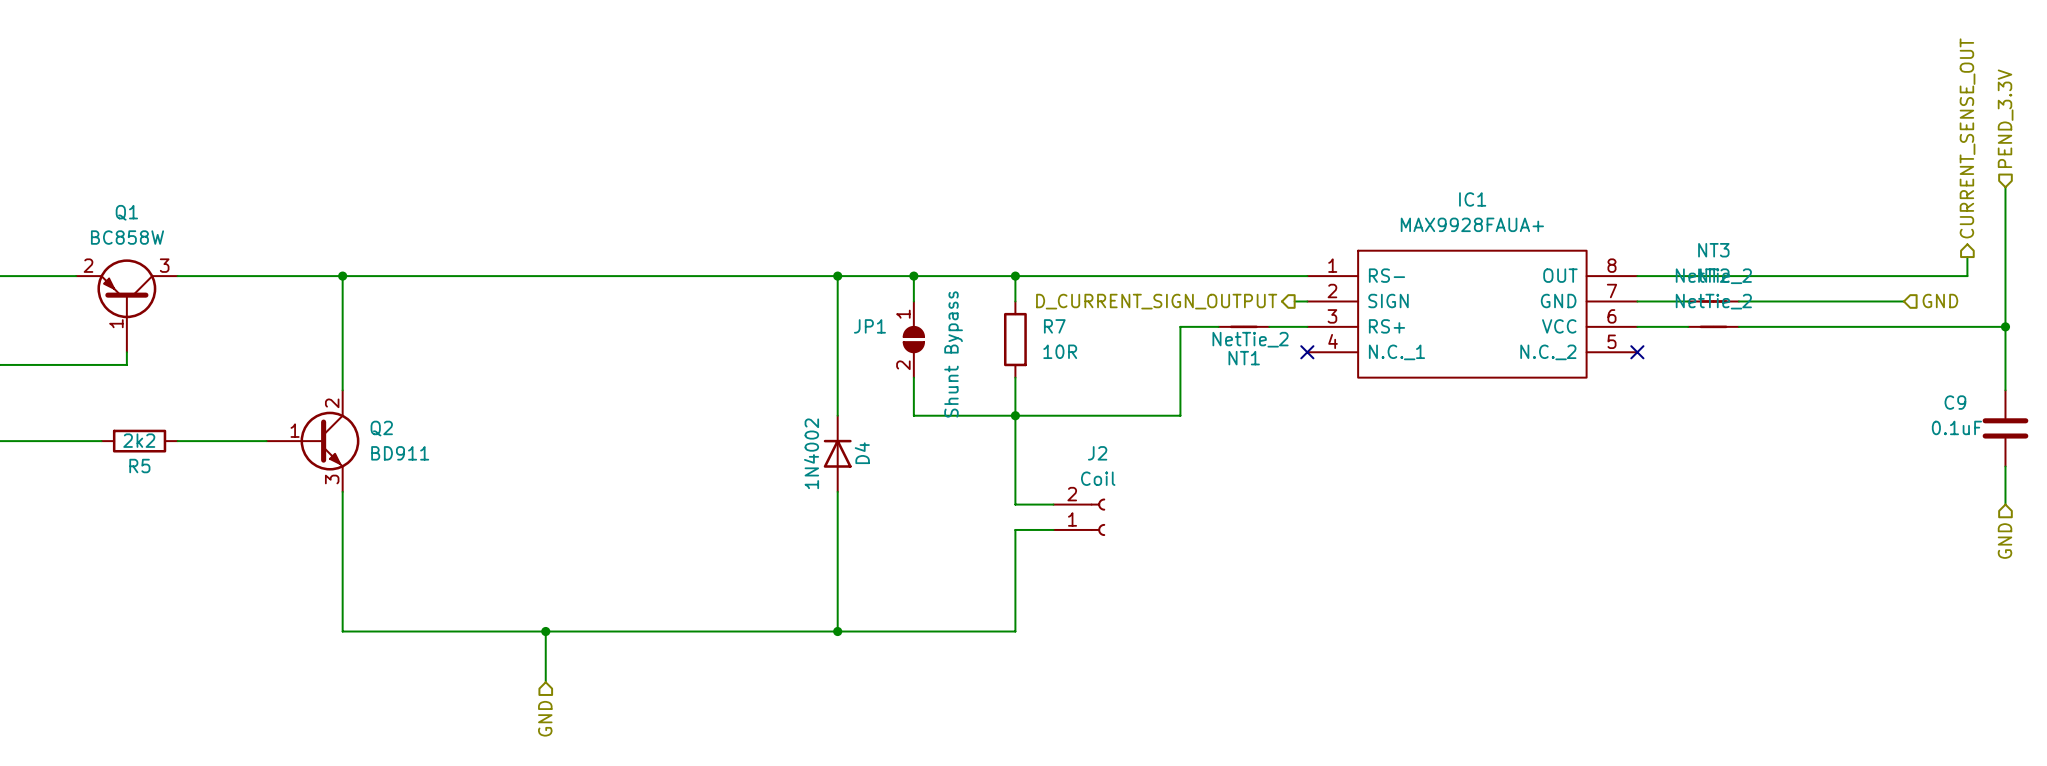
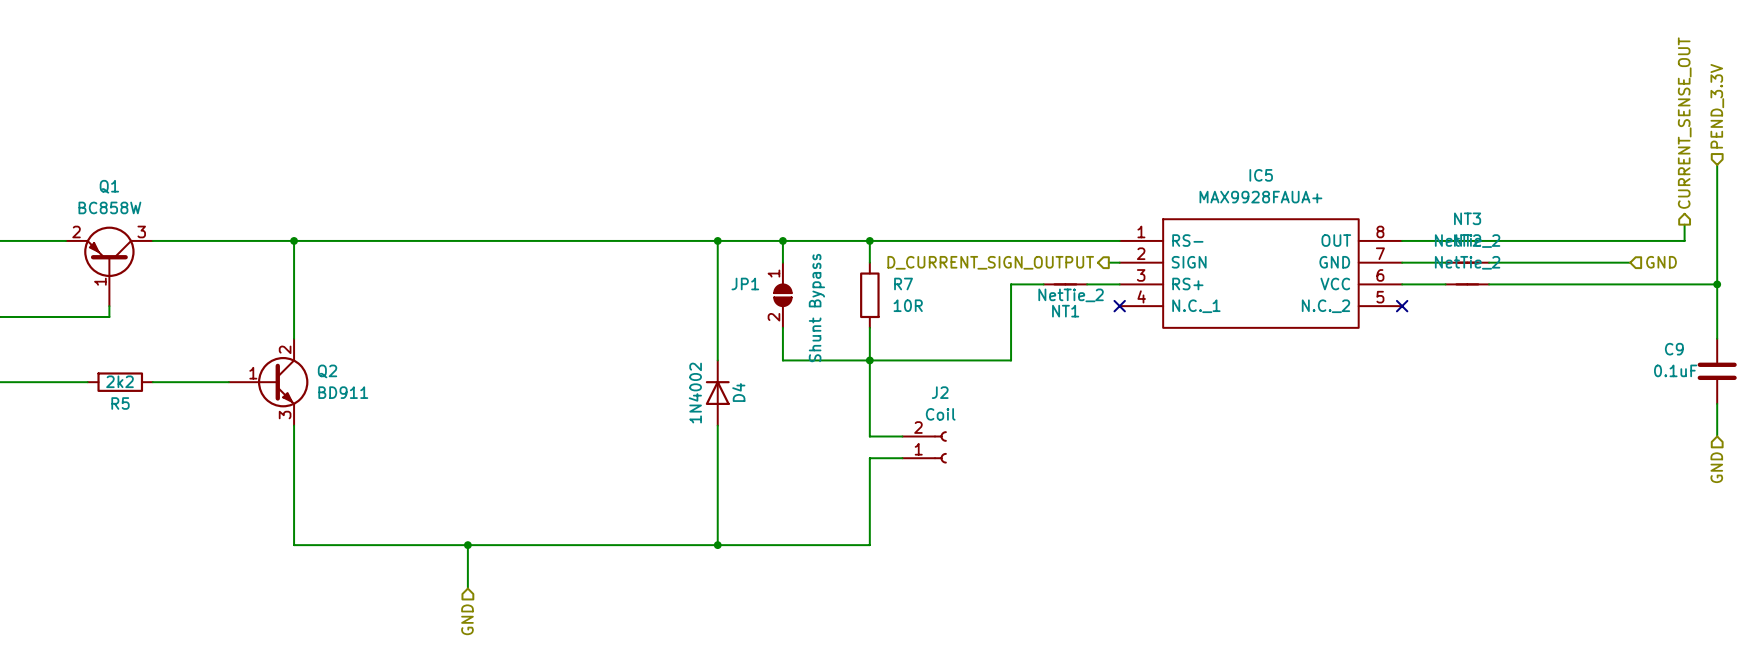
IC1 name: IC1 (1472, 199) -> IC5 (1261, 175)

